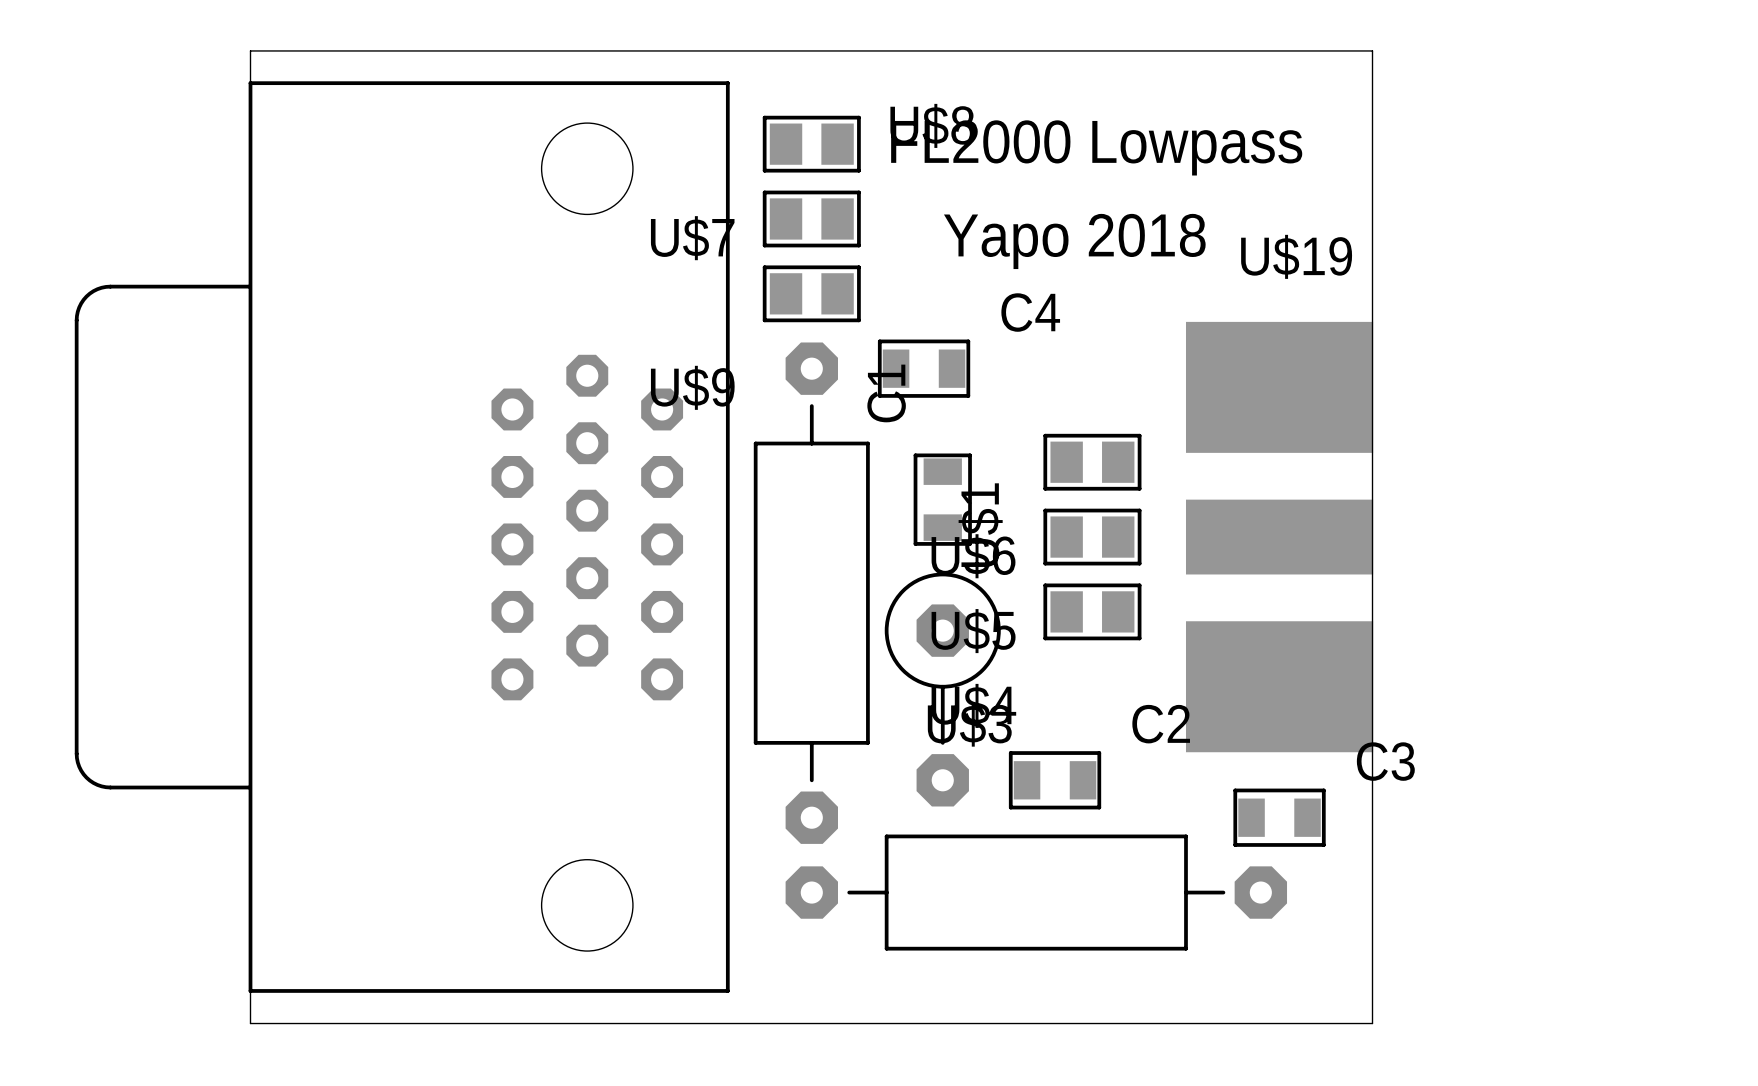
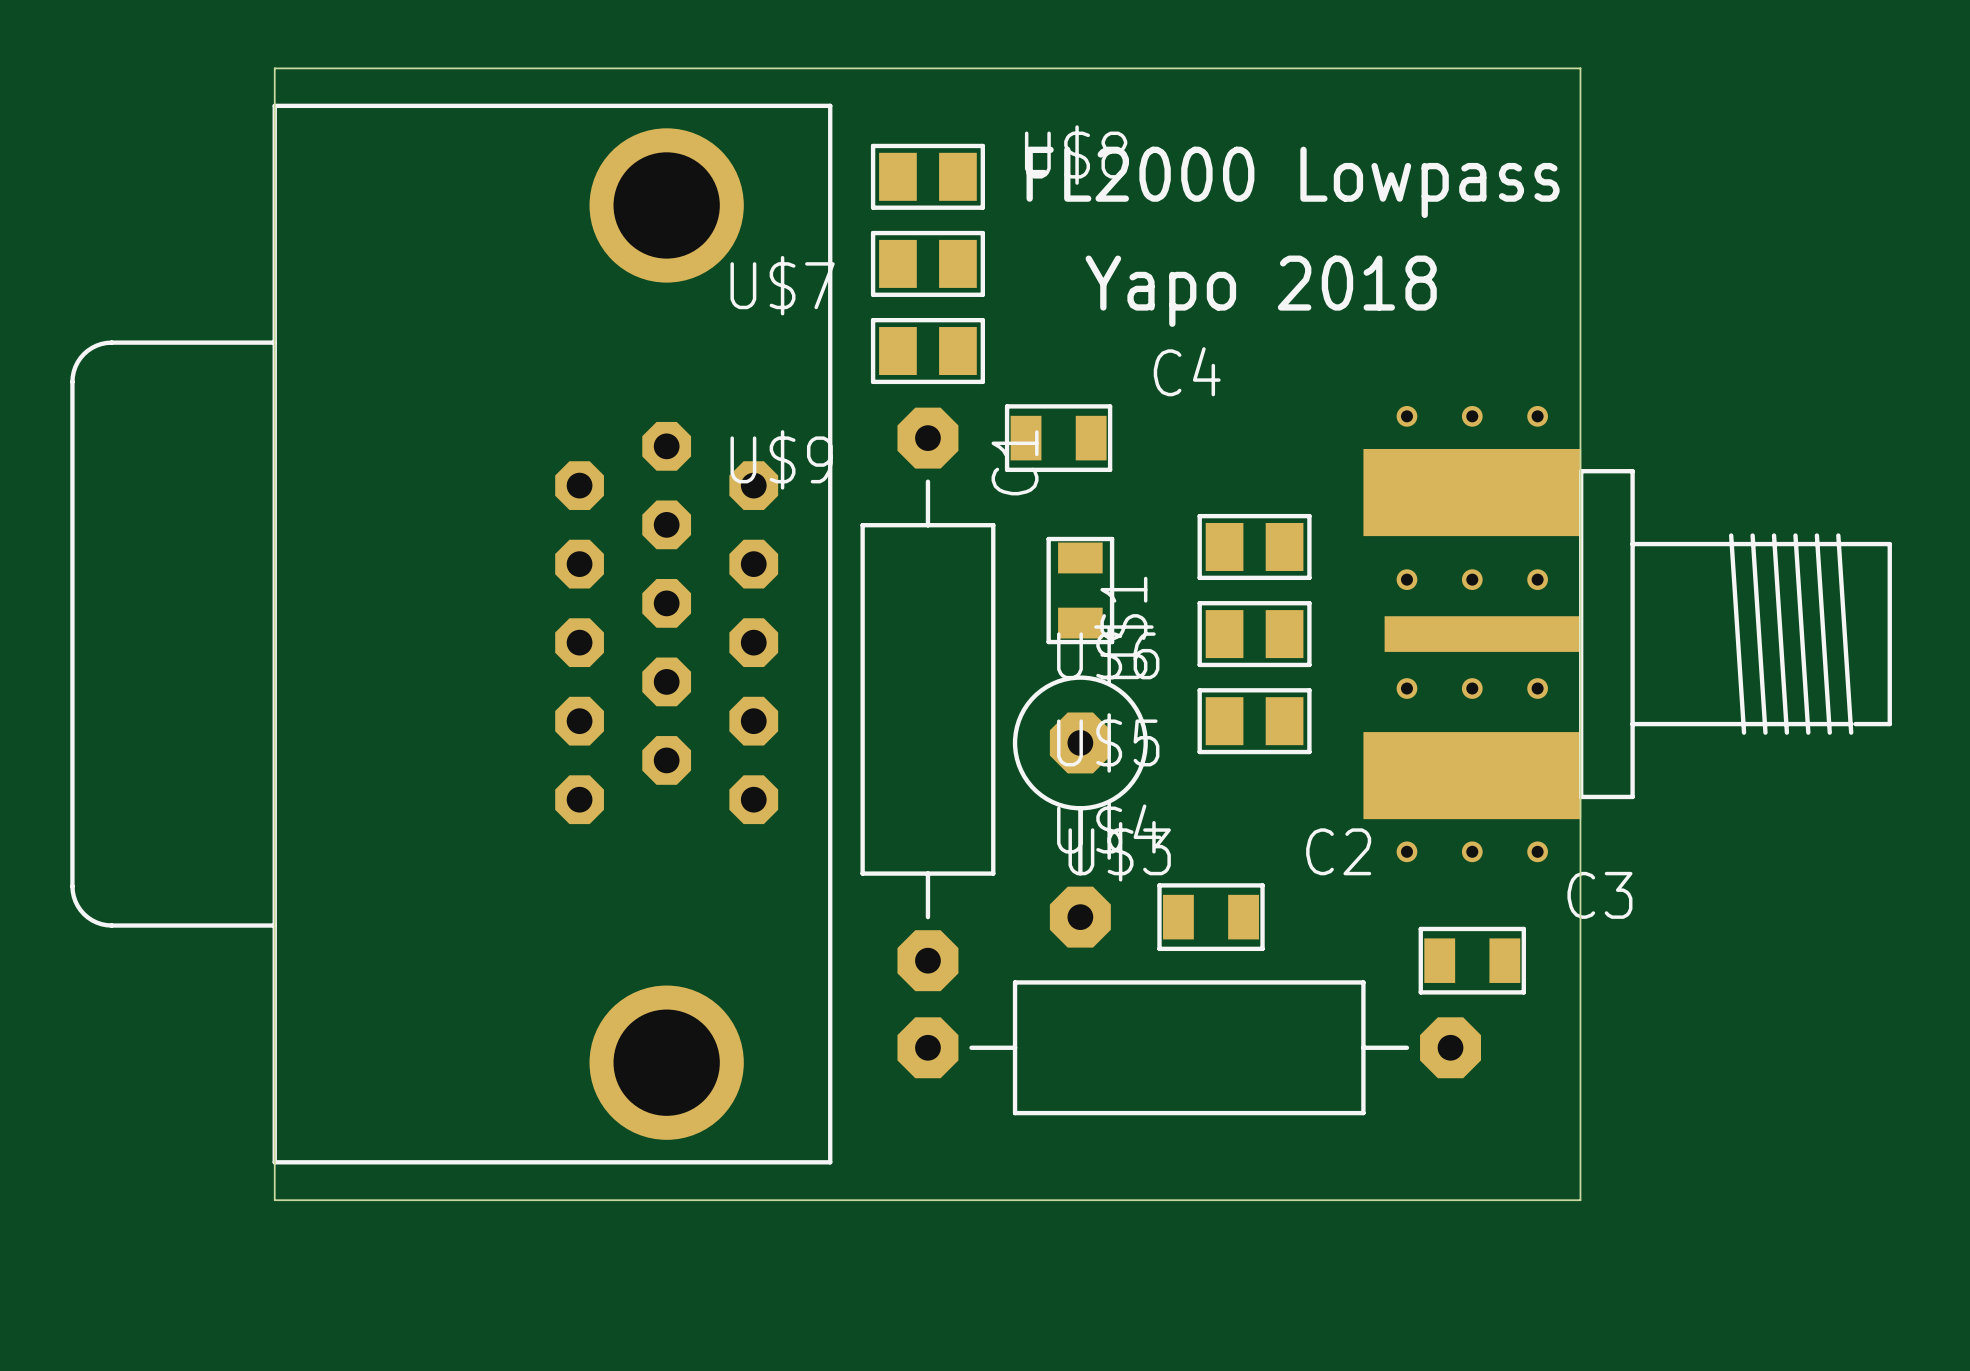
part footprint: [74, 81, 730, 993] -> [70, 103, 833, 1165]
U$19: (1279, 537) -> none
part: none -> (1627, 634)

